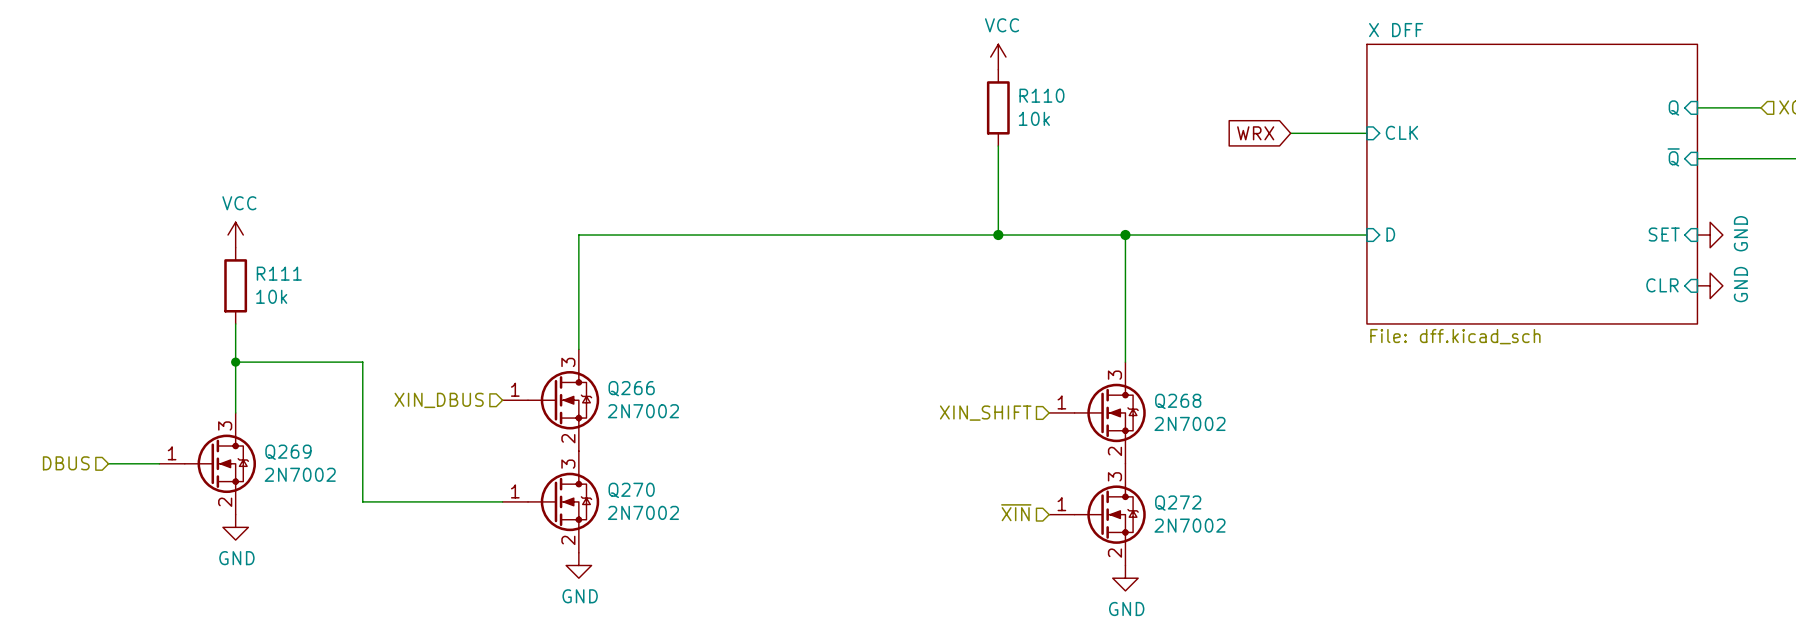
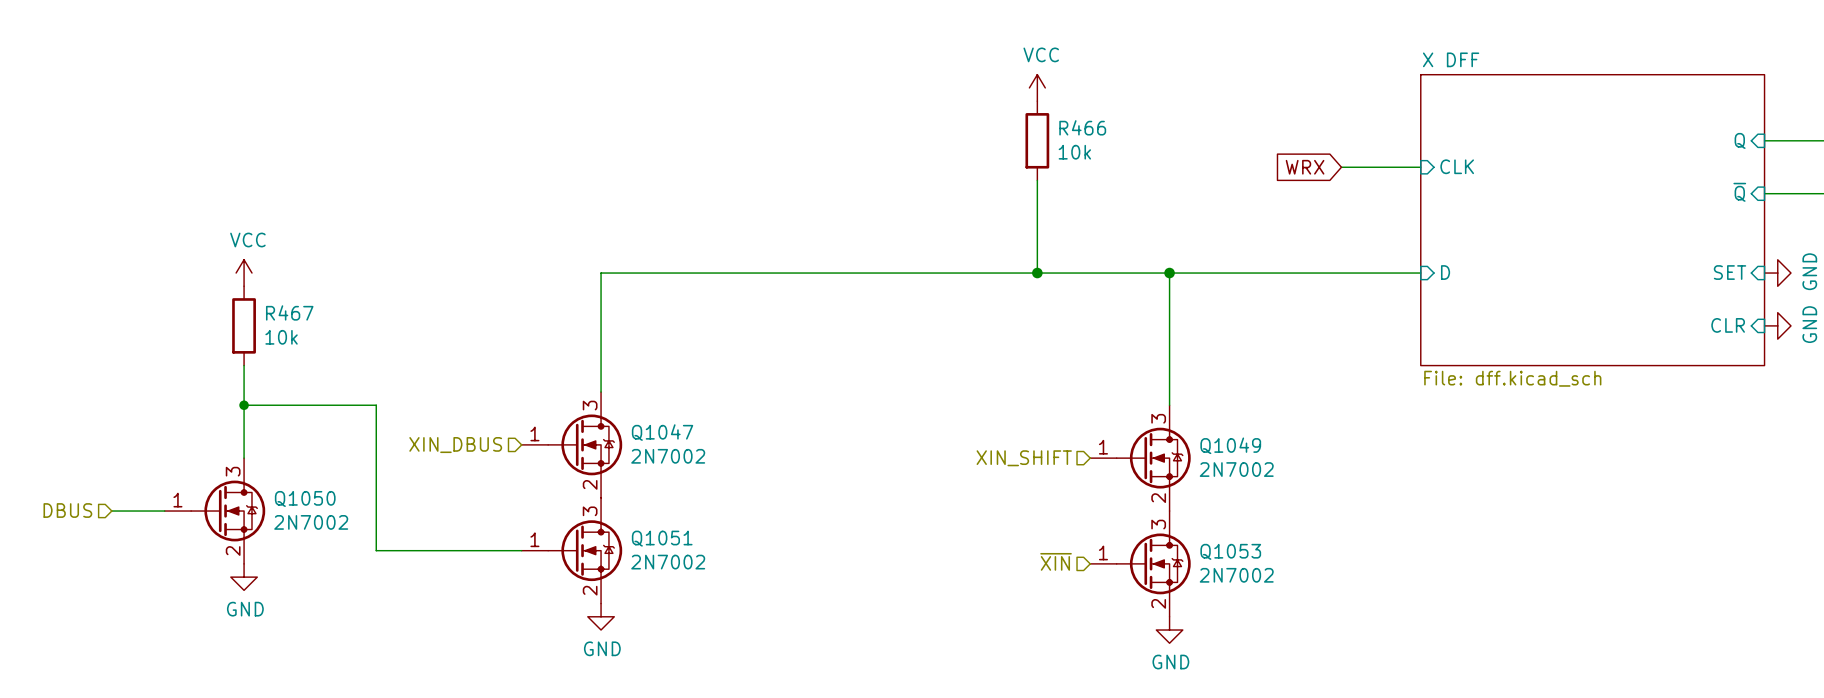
R110 name: R110 (1041, 95) -> R466 (1082, 127)
R111 name: R111 (279, 273) -> R467 (289, 312)
Q266 name: Q266 (631, 388) -> Q1047 (662, 432)
Q268 name: Q268 (1178, 401) -> Q1049 (1230, 445)
Q269 name: Q269 (288, 452) -> Q1050 (305, 498)
Q270 name: Q270 (631, 490) -> Q1051 (662, 538)
Q272 name: Q272 (1178, 503) -> Q1053 (1230, 551)

